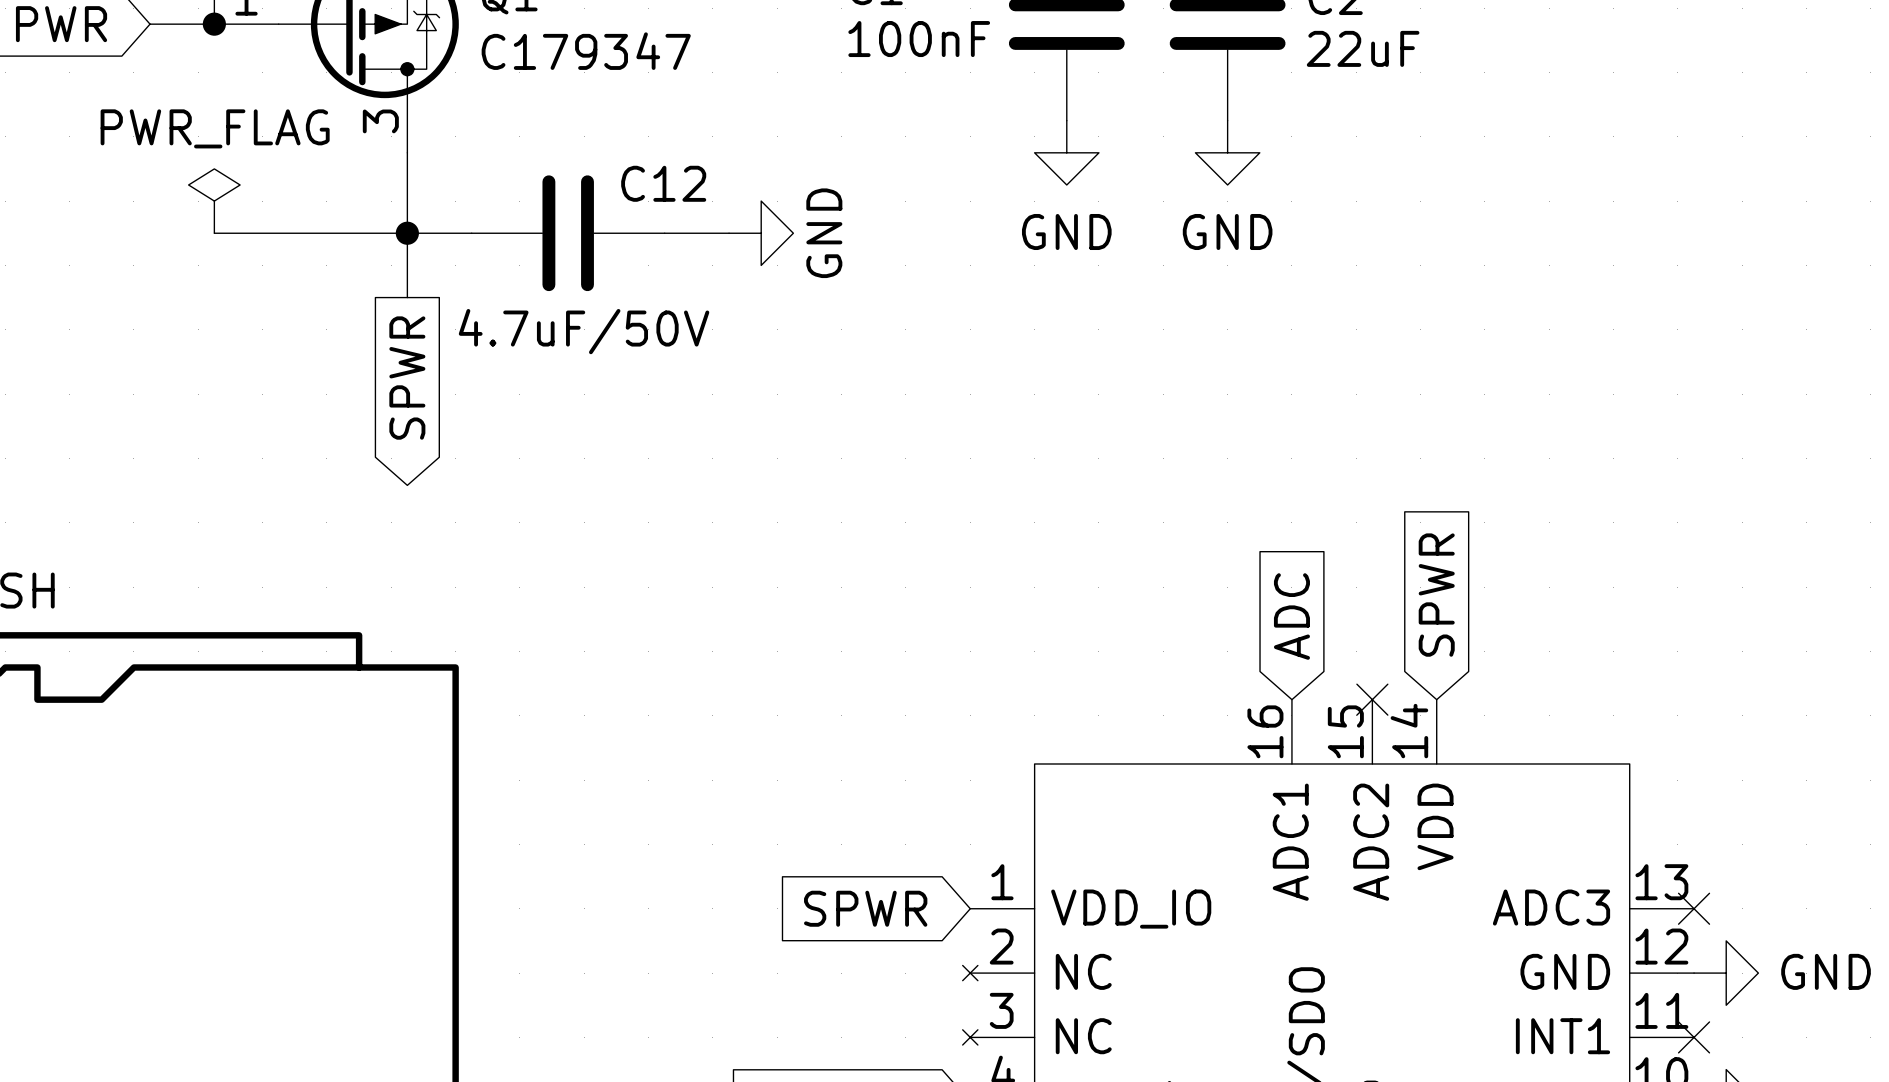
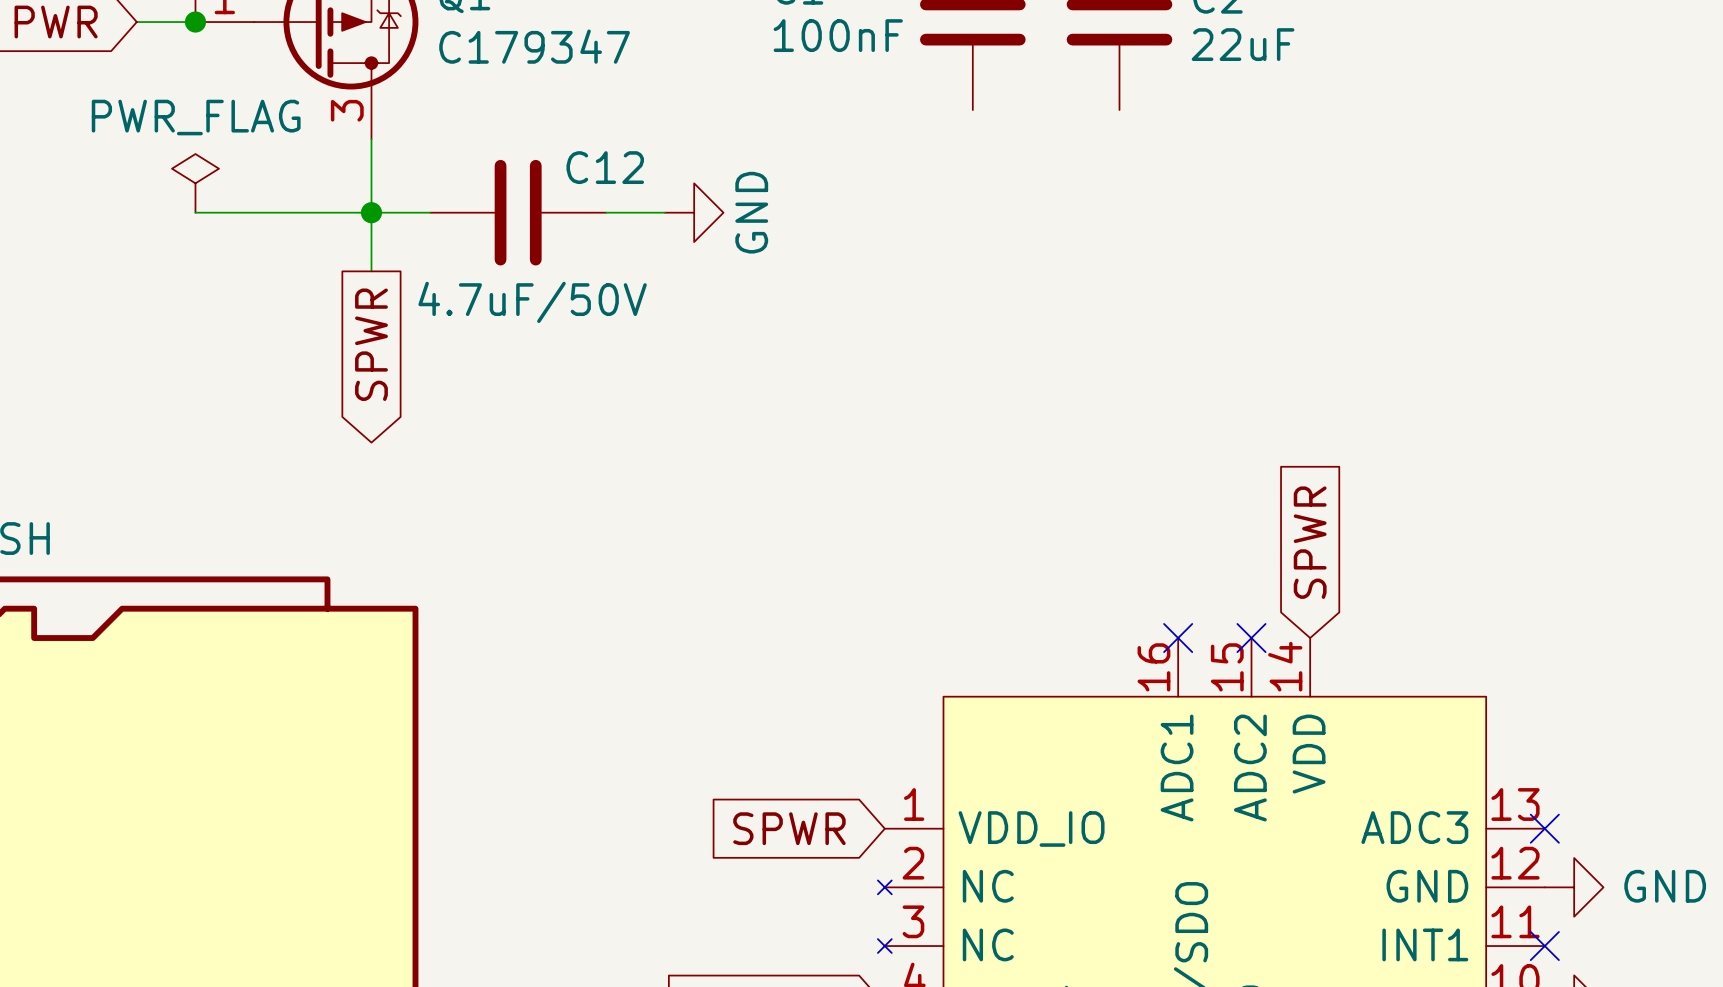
power symbol: GND (1066, 152) -> none
power symbol: GND (1227, 152) -> none
global label: ADC (1291, 616) -> none
no-connect mark: none -> (1178, 638)

